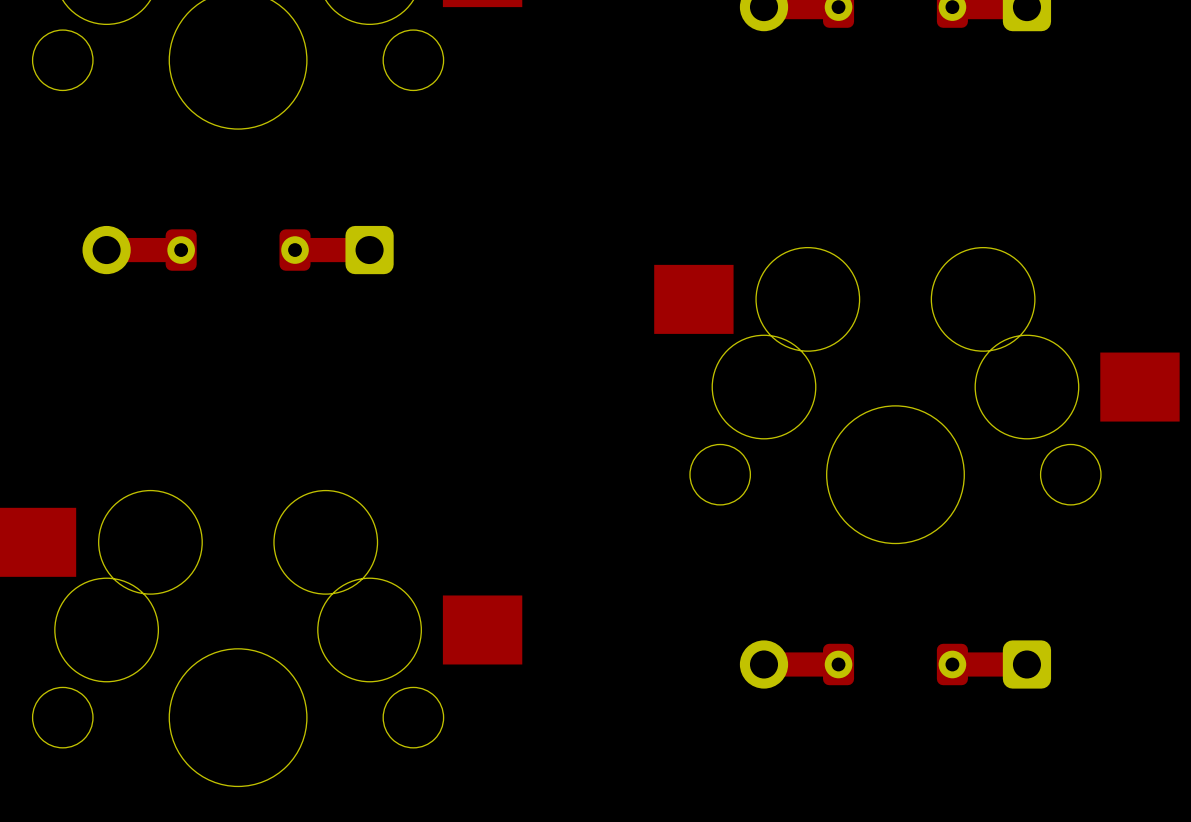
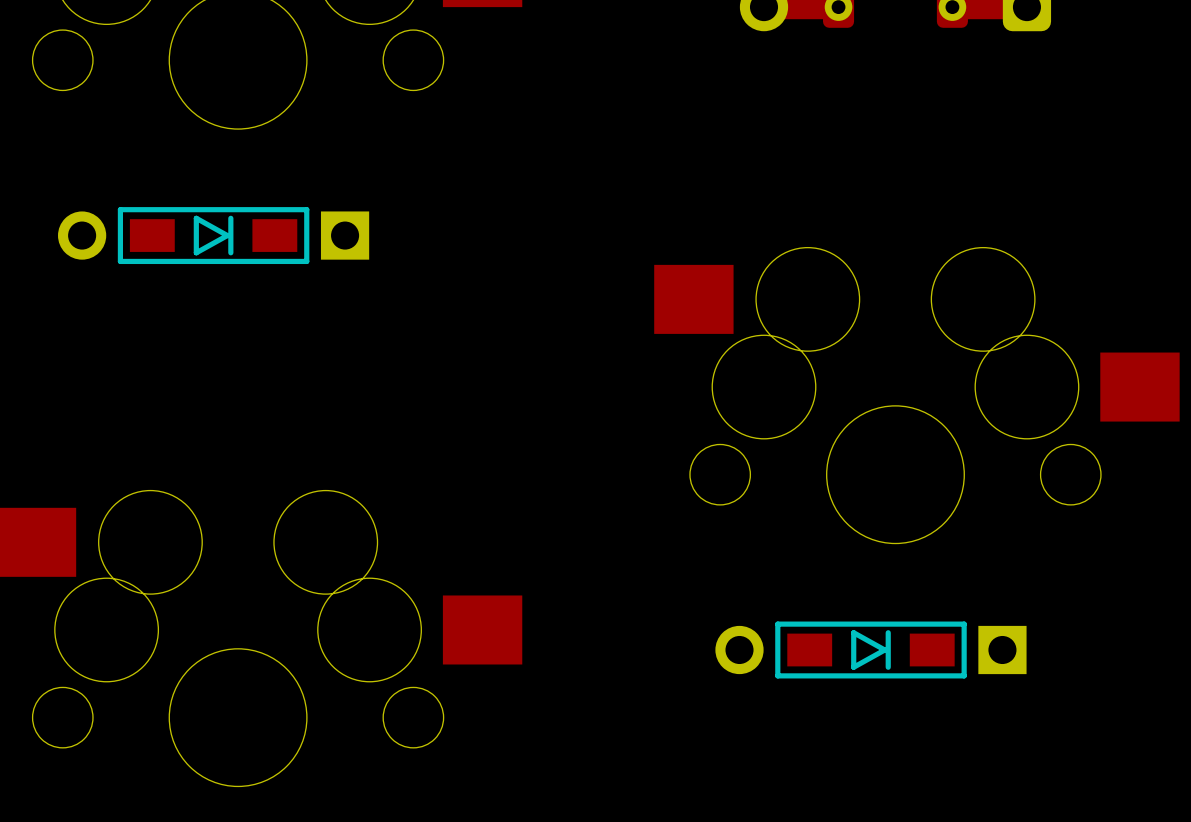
part footprint: [82, 225, 394, 275] -> [58, 207, 370, 265]
part footprint: [739, 640, 1052, 689] -> [715, 621, 1027, 679]

